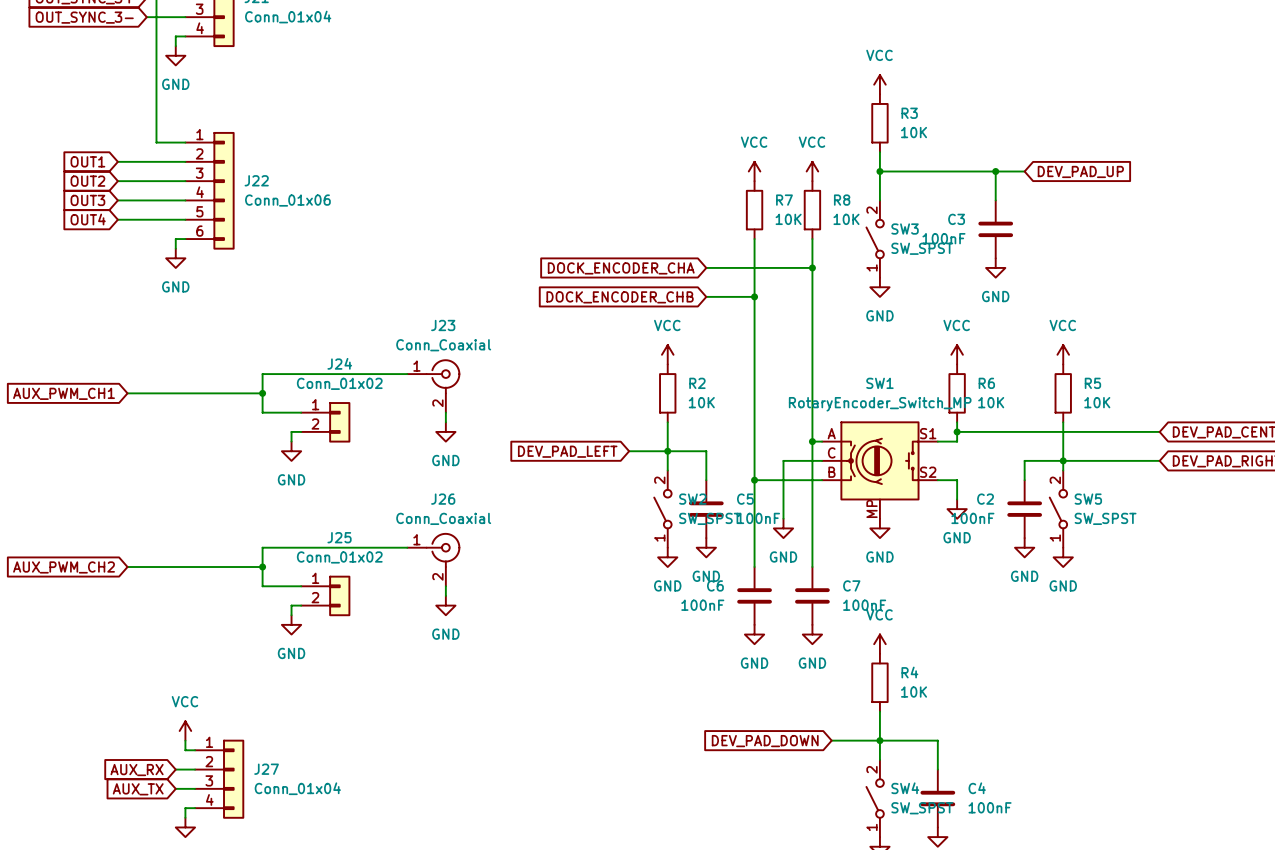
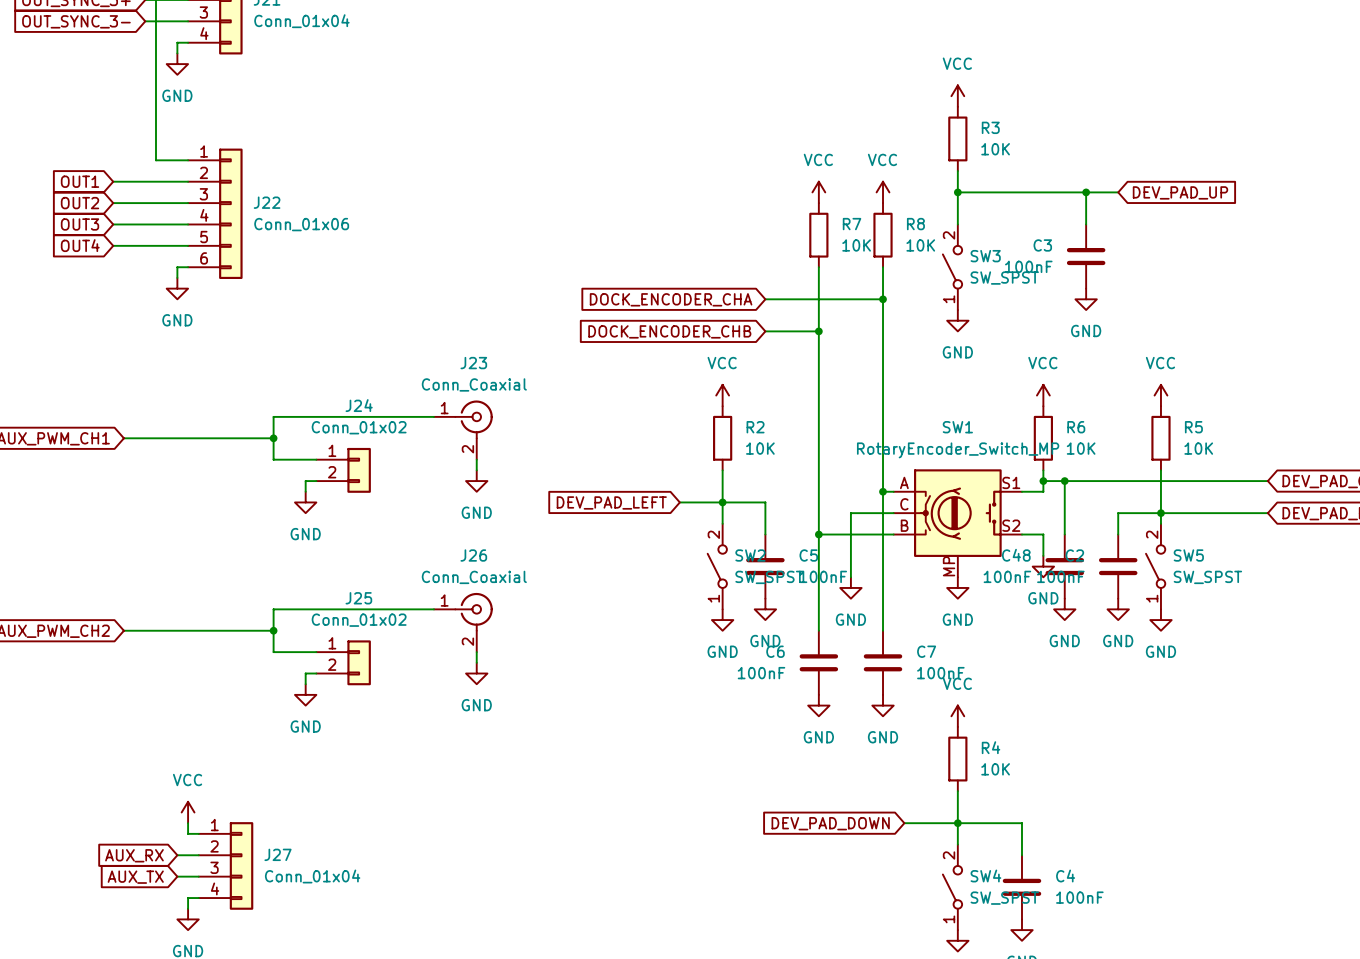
wire: none -> (1064, 481) (1064, 534)
junction: none -> (1064, 481)
C48: none -> 100nF (1064, 566)
power symbol: none -> GND (1064, 609)

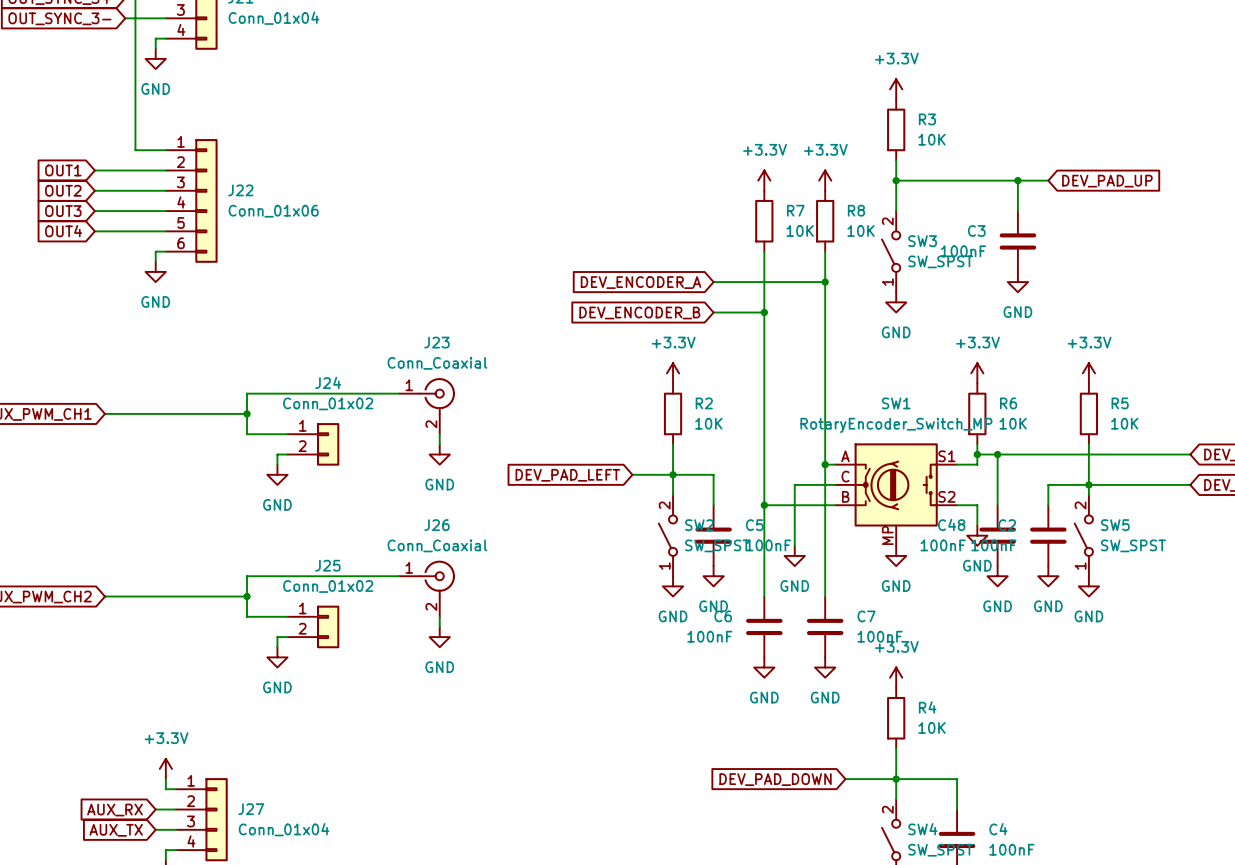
power symbol: VCC (957, 96) -> +3.3V (896, 89)
power symbol: VCC (818, 192) -> +3.3V (764, 180)
power symbol: VCC (883, 192) -> +3.3V (825, 180)
global label: DOCK_ENCODER_CHA (671, 299) -> DEV_ENCODER_A (641, 282)
global label: DOCK_ENCODER_CHB (669, 331) -> DEV_ENCODER_B (639, 312)
power symbol: VCC (722, 395) -> +3.3V (673, 373)
power symbol: VCC (1043, 395) -> +3.3V (977, 373)
power symbol: VCC (1160, 395) -> +3.3V (1088, 373)
power symbol: VCC (957, 716) -> +3.3V (896, 677)
power symbol: VCC (188, 812) -> +3.3V (165, 768)

